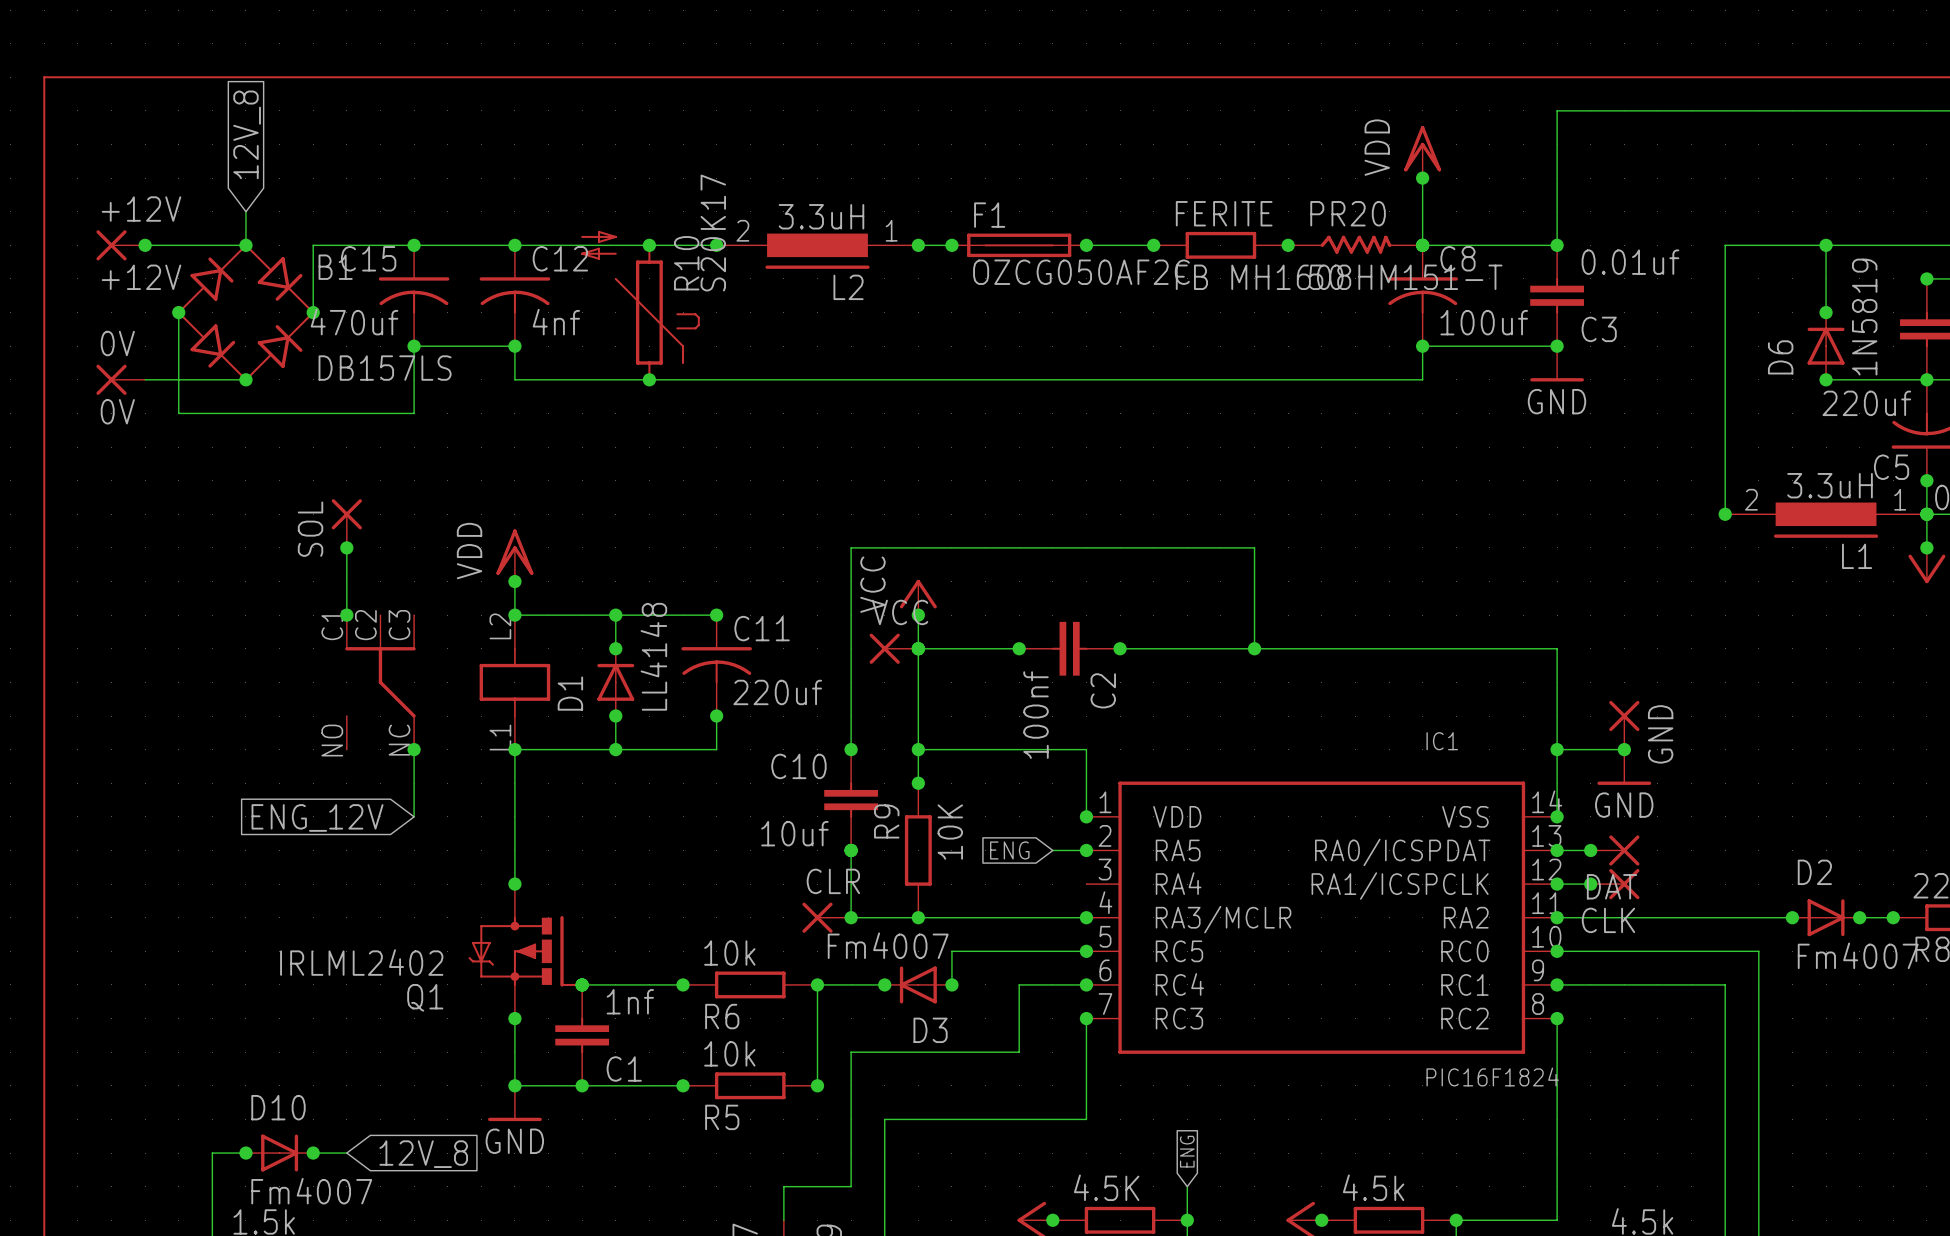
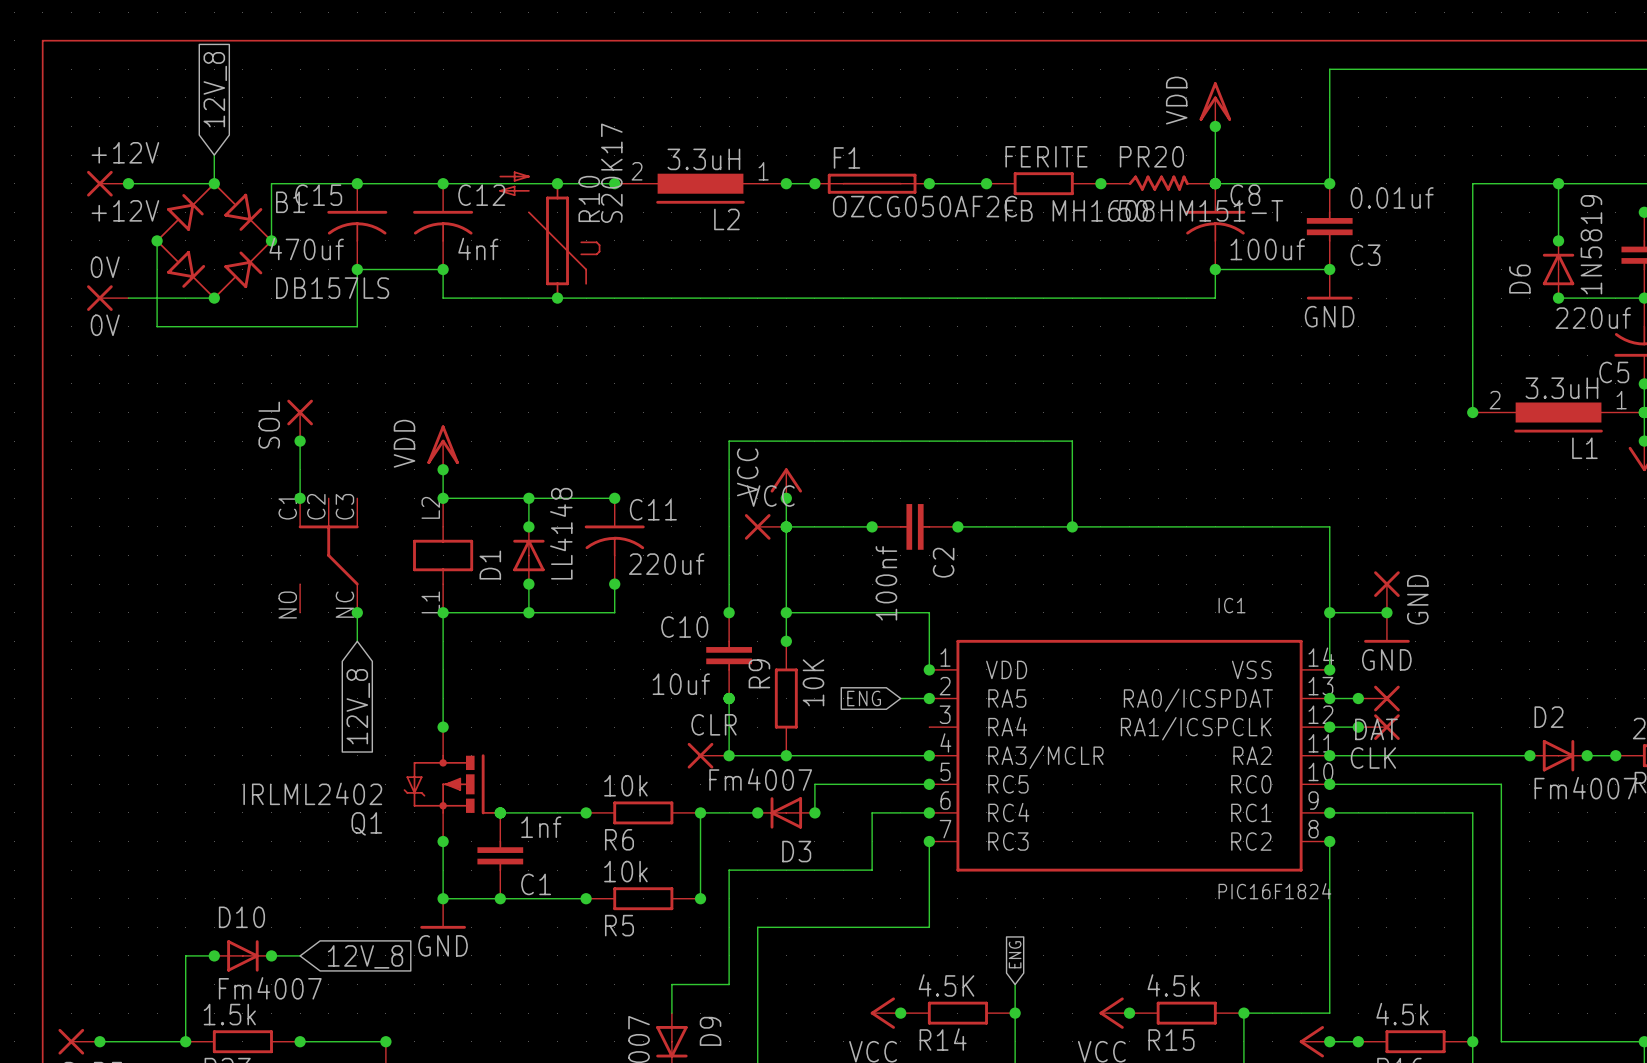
wire: (414, 783) (414, 816) -> none
global label: ENG_12V (317, 817) -> none
global label: none -> 12V_8 (358, 706)

